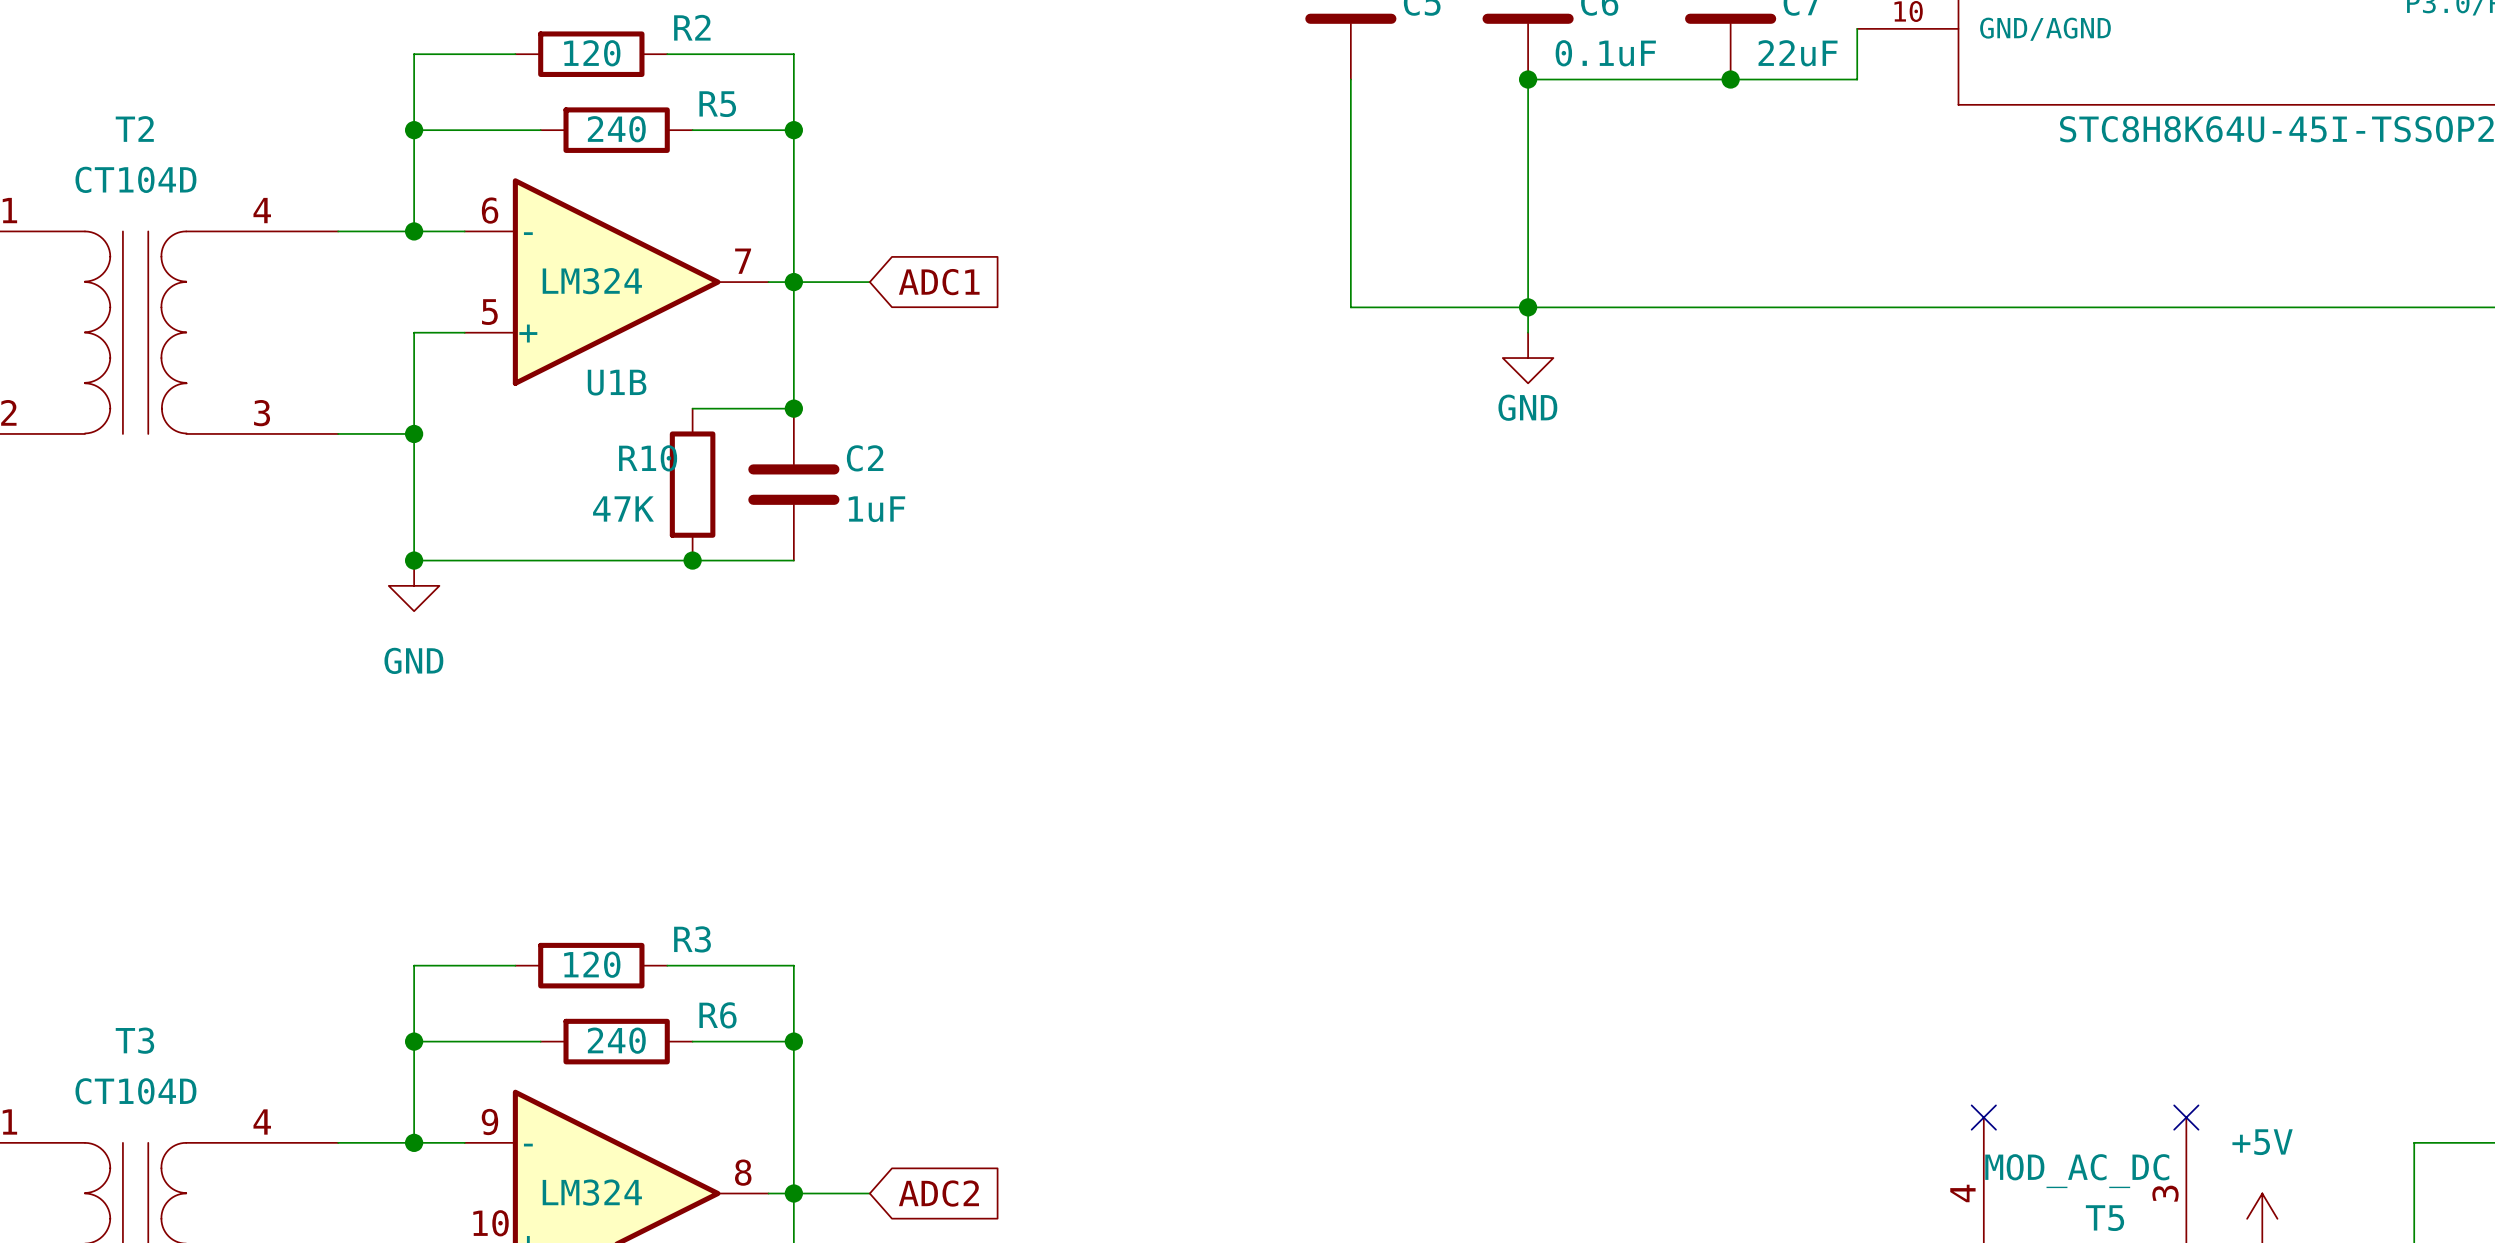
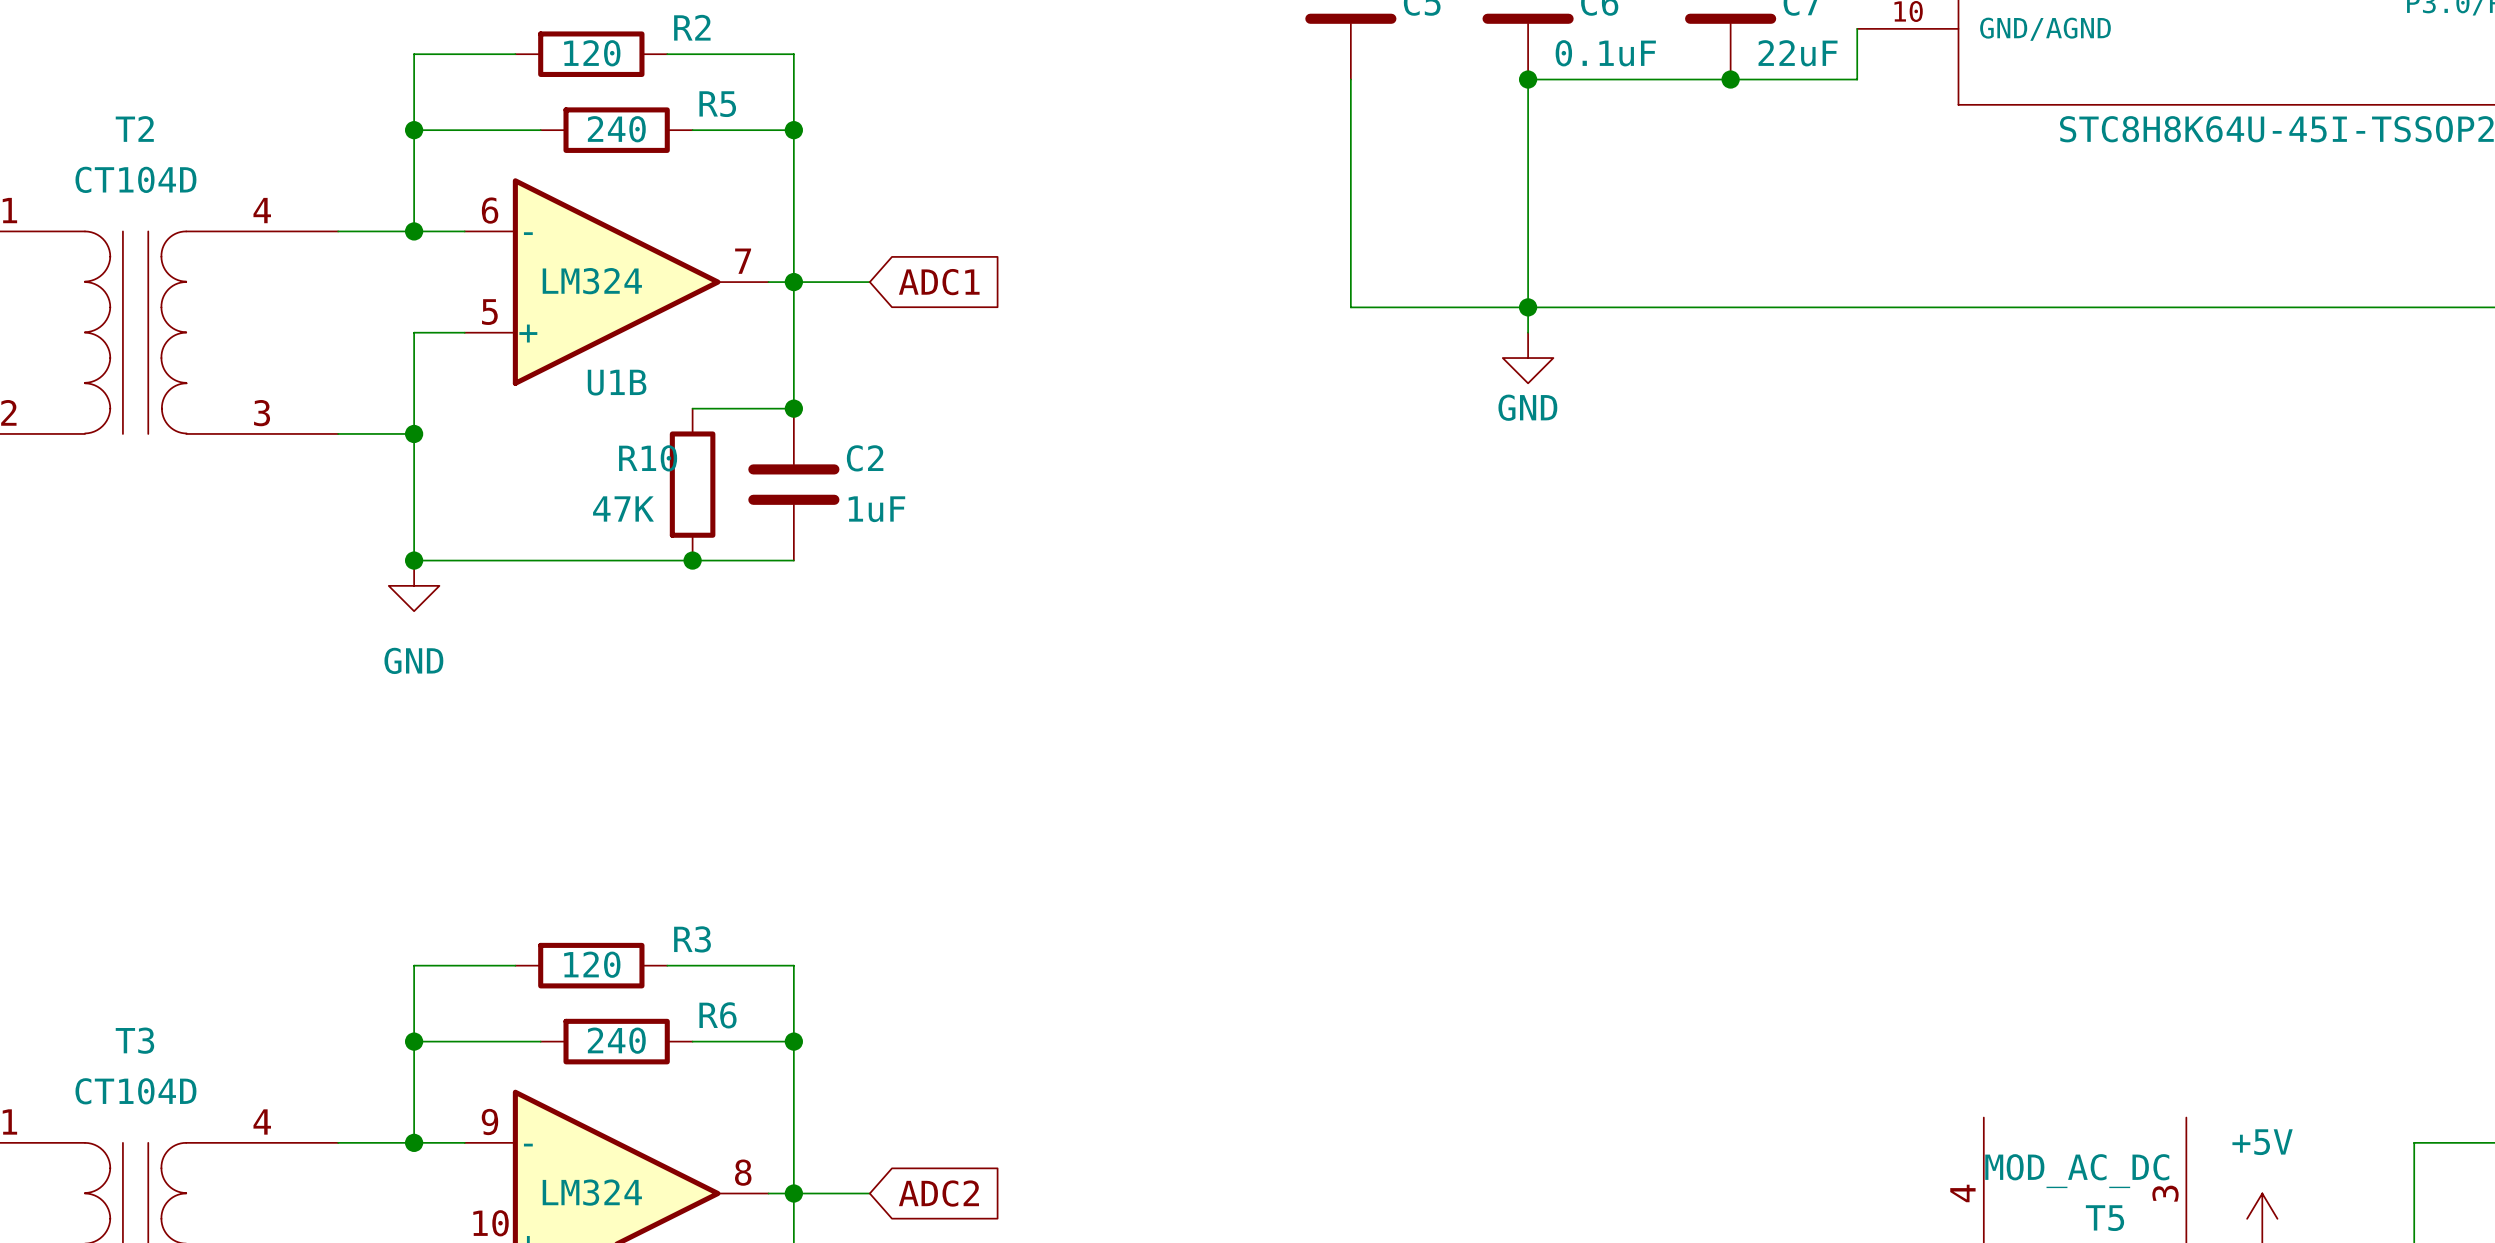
no-connect mark: (1983, 1117) -> none
no-connect mark: (2186, 1117) -> none

